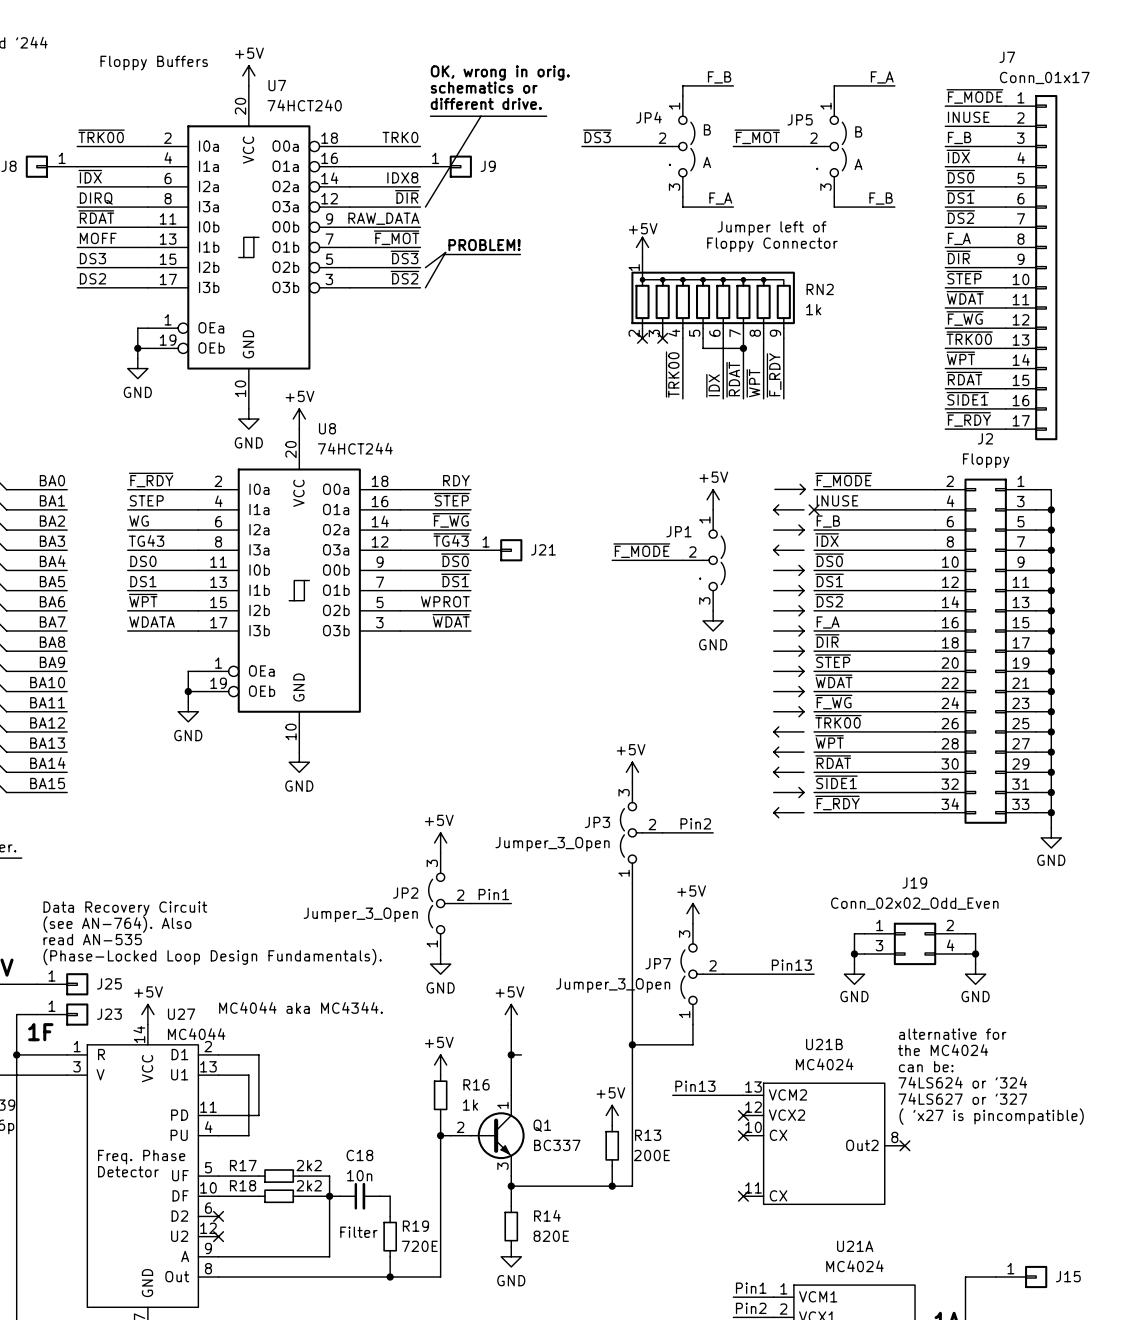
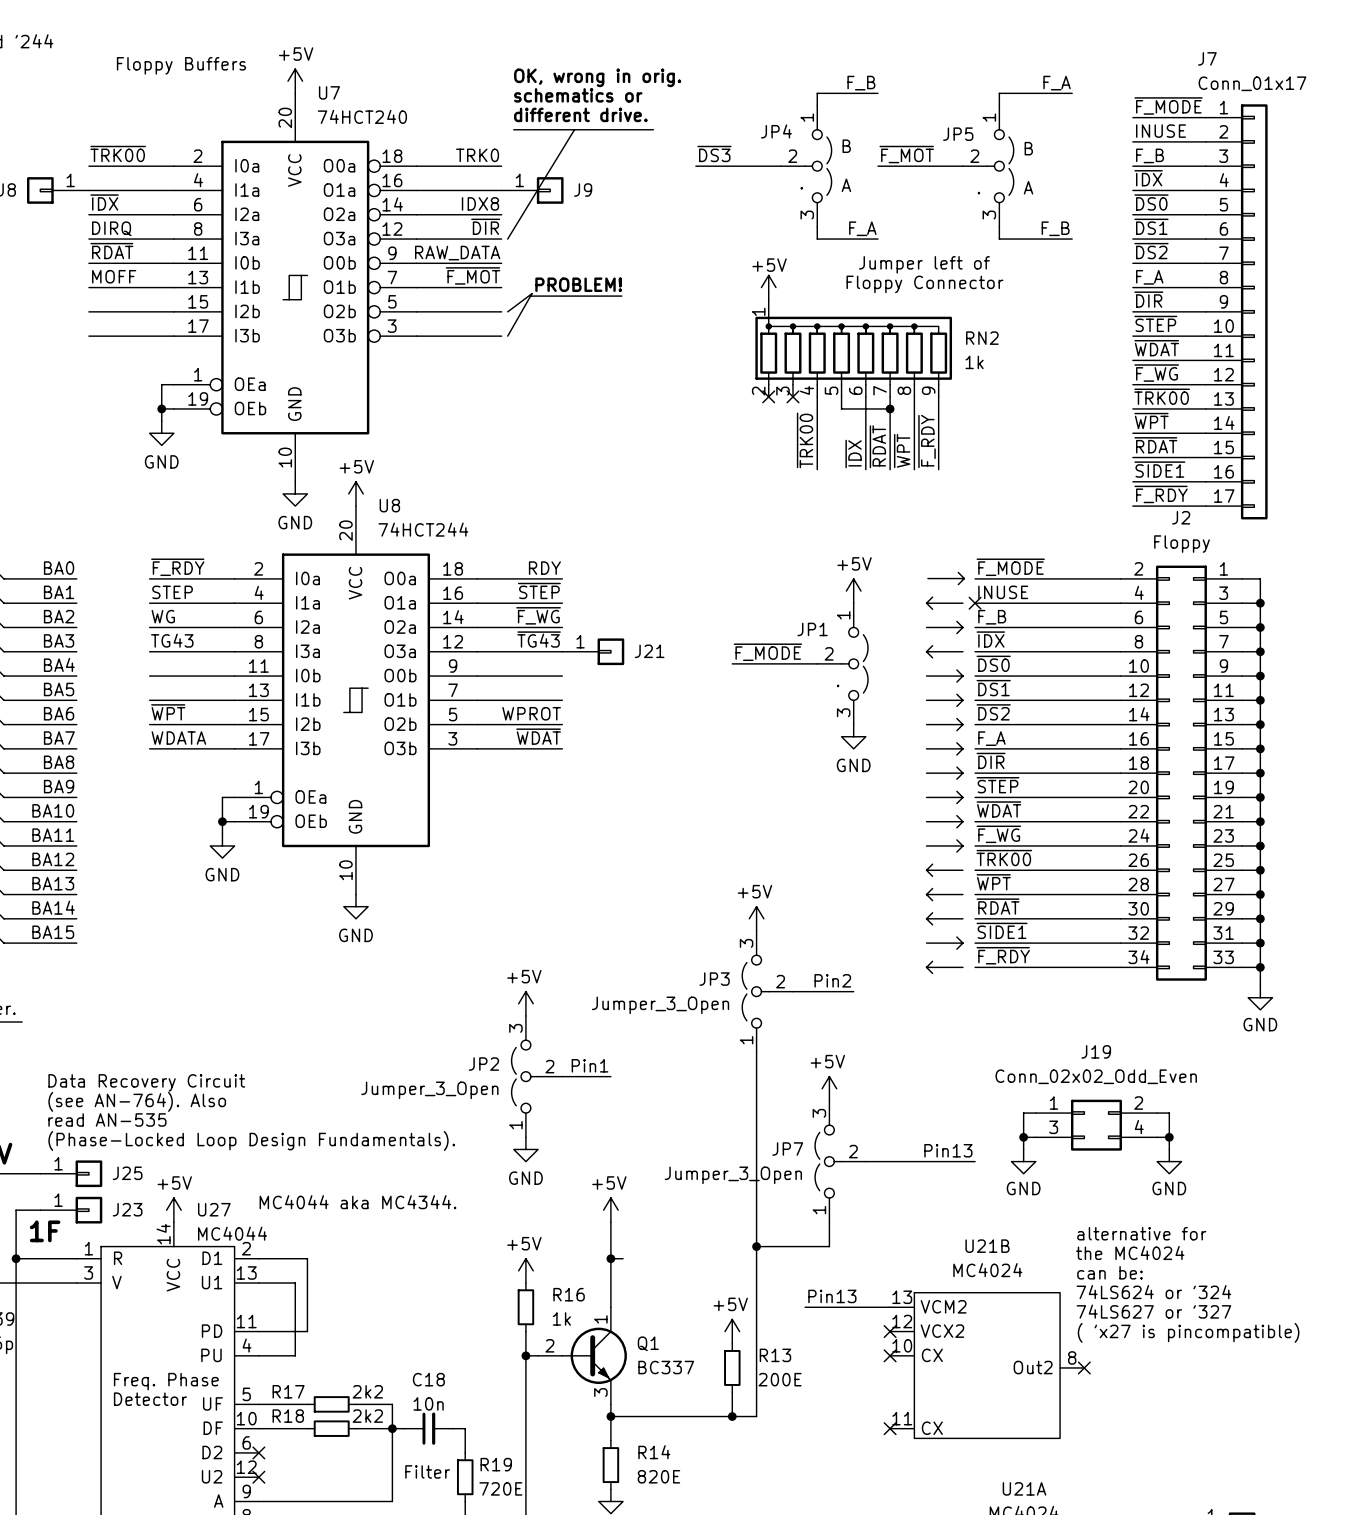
label: ~{DS3} (404, 257) -> none
label: DS3 (92, 258) -> none
label: ~{DS2} (404, 277) -> none
label: DS2 (92, 278) -> none
label: ~{DS0} (455, 560) -> none
label: DS0 (143, 561) -> none
label: ~{DS1} (455, 580) -> none
label: DS1 (143, 581) -> none

